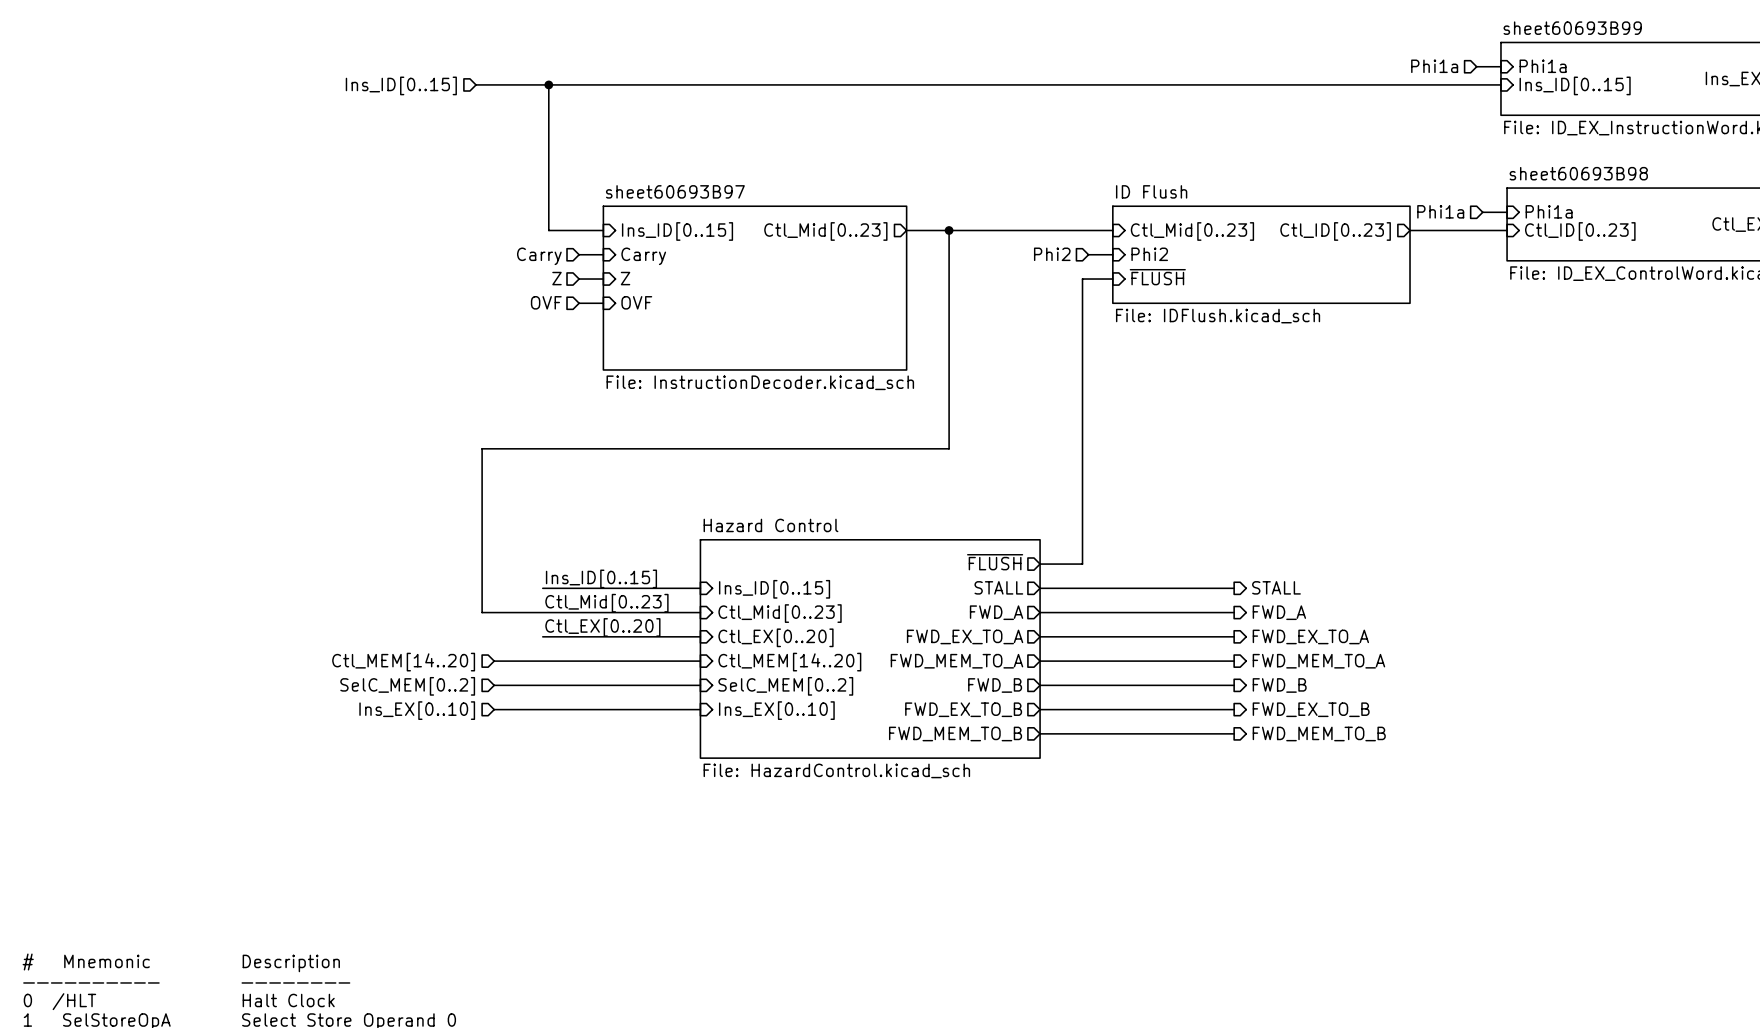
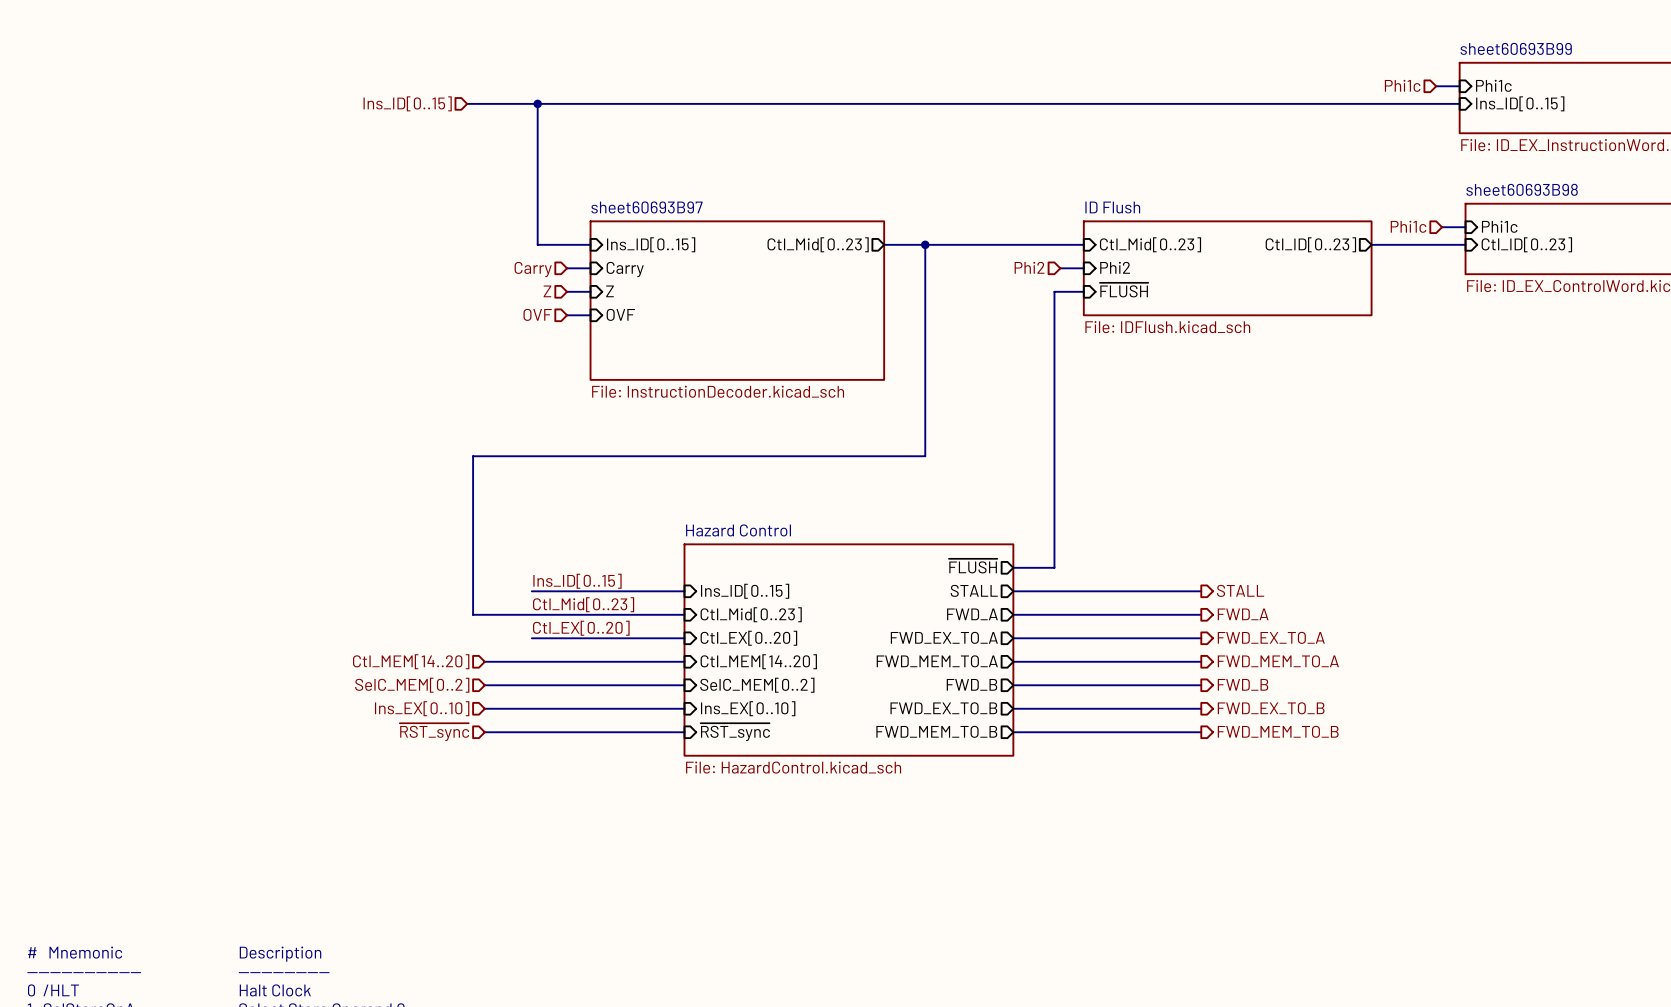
hierarchical label: Phi1a (1434, 66) -> Phi1c (1402, 85)
sheet pin: Phi1a (1543, 66) -> Phi1c (1493, 85)
hierarchical label: Phi1a (1440, 211) -> Phi1c (1408, 226)
sheet pin: Phi1a (1549, 211) -> Phi1c (1499, 226)
wire: none -> (484, 732) (684, 732)
hierarchical label: none -> ~{RST_sync} (434, 732)
sheet pin: none -> ~{RST_sync} (735, 732)

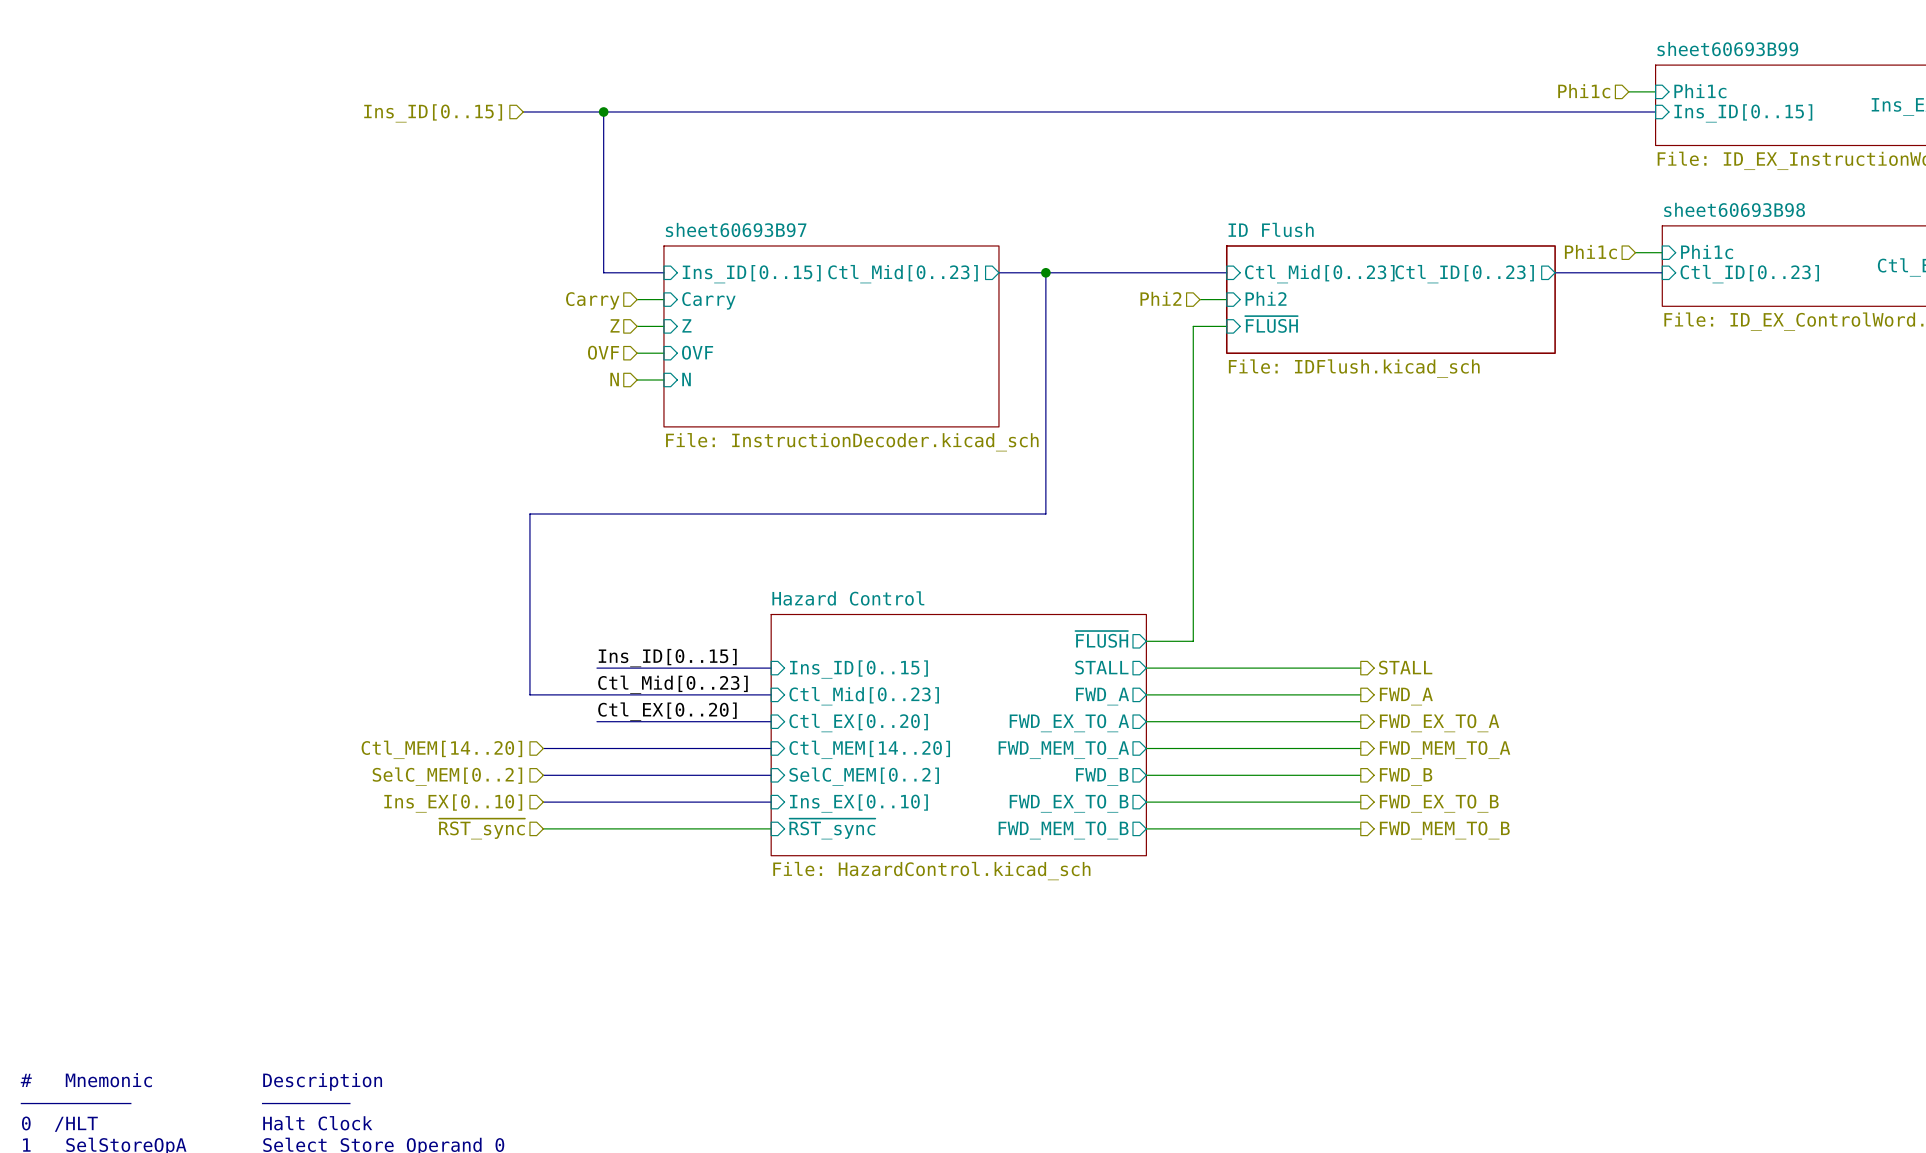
hierarchical label: none -> N (614, 379)
wire: none -> (637, 380) (663, 380)
sheet pin: none -> N (686, 379)

